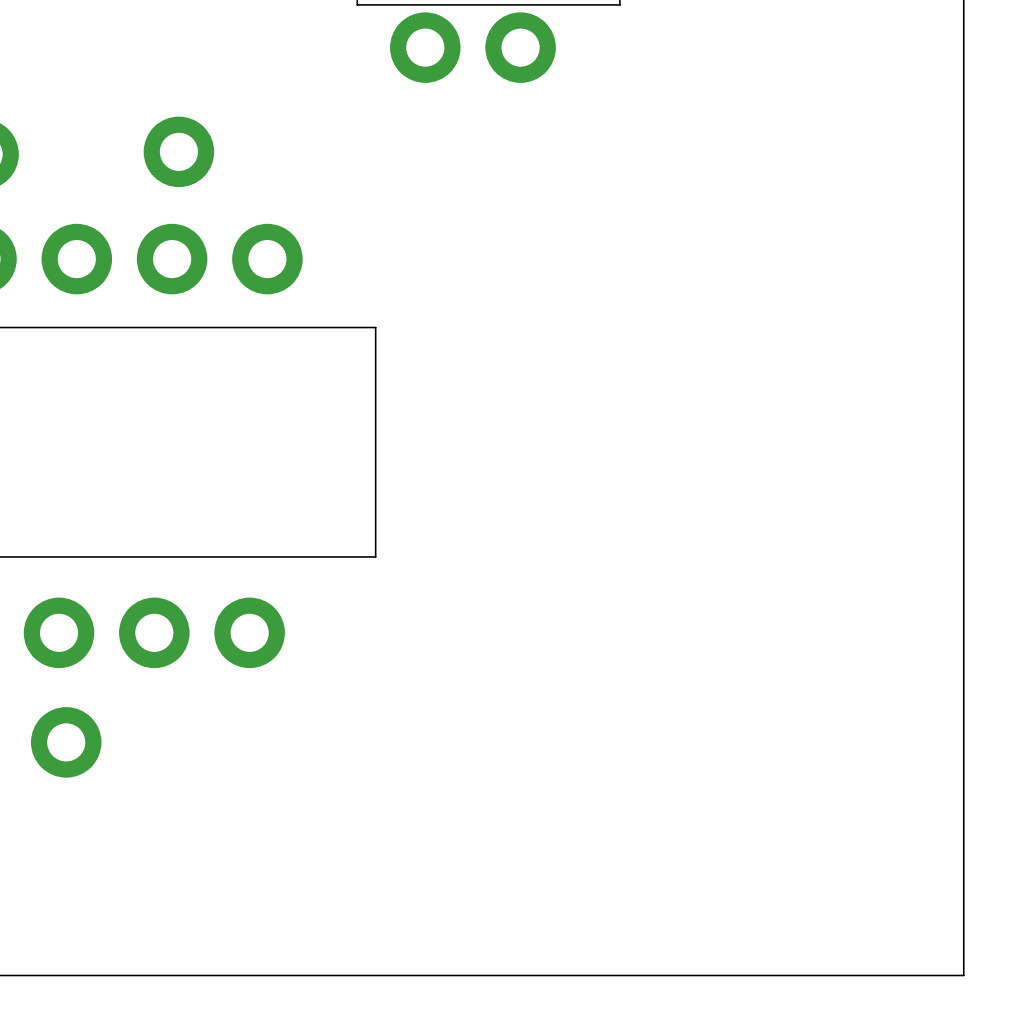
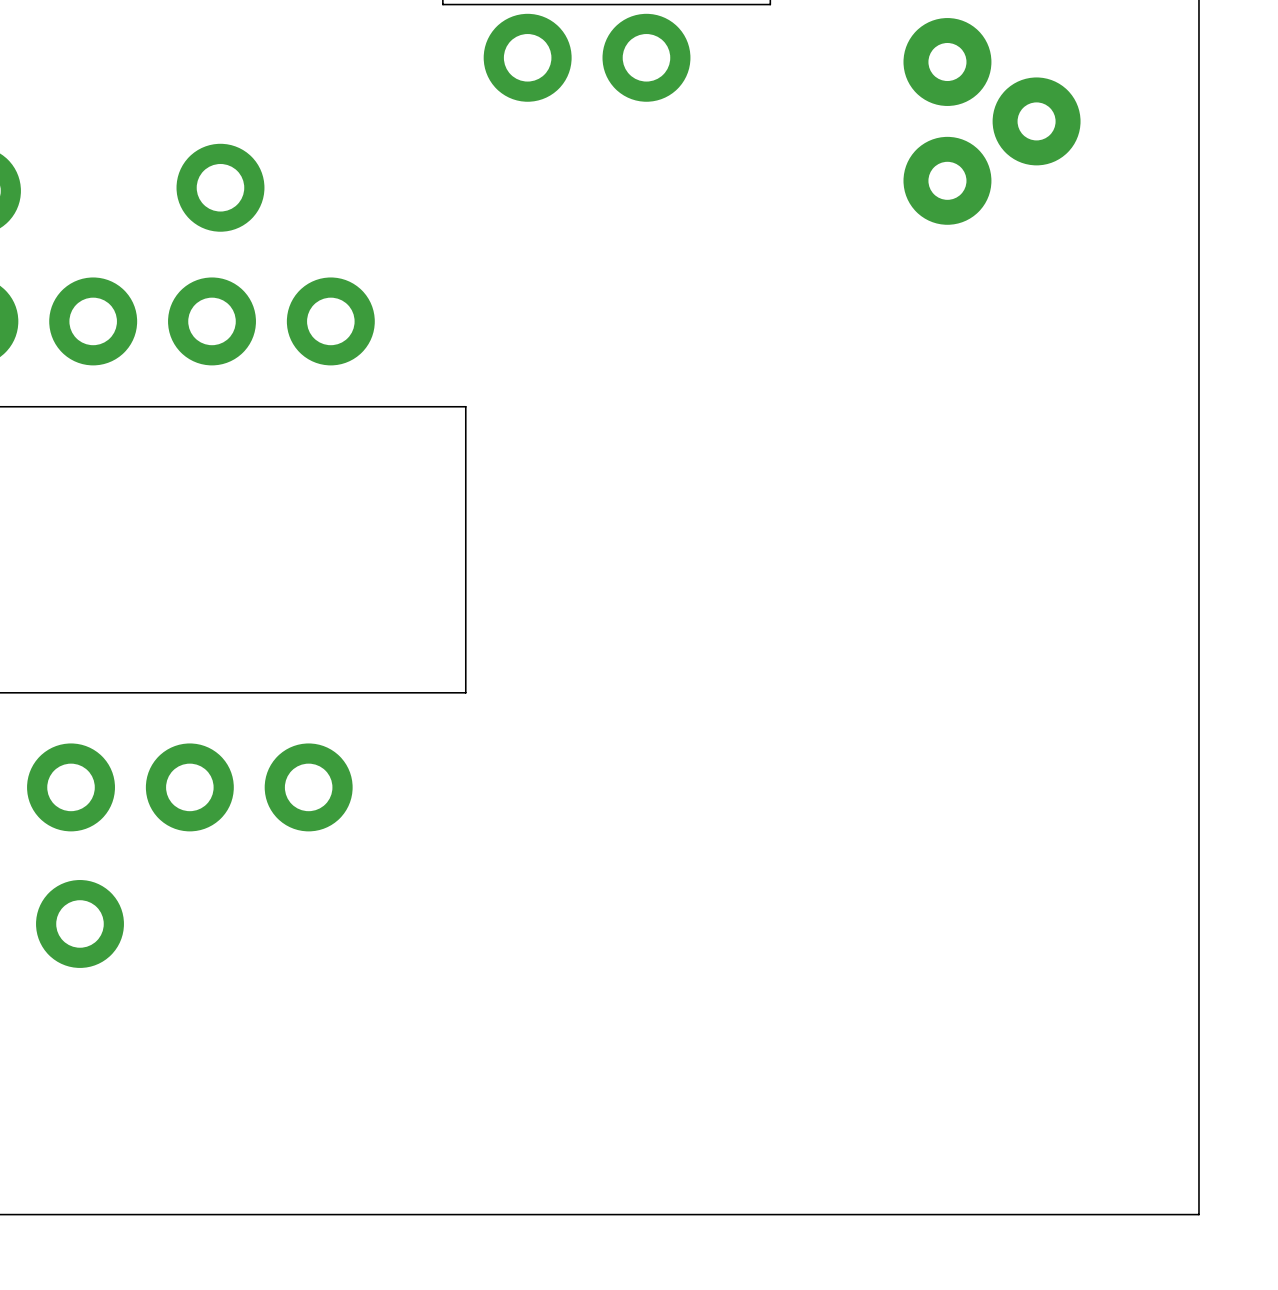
part: none -> (992, 121)

